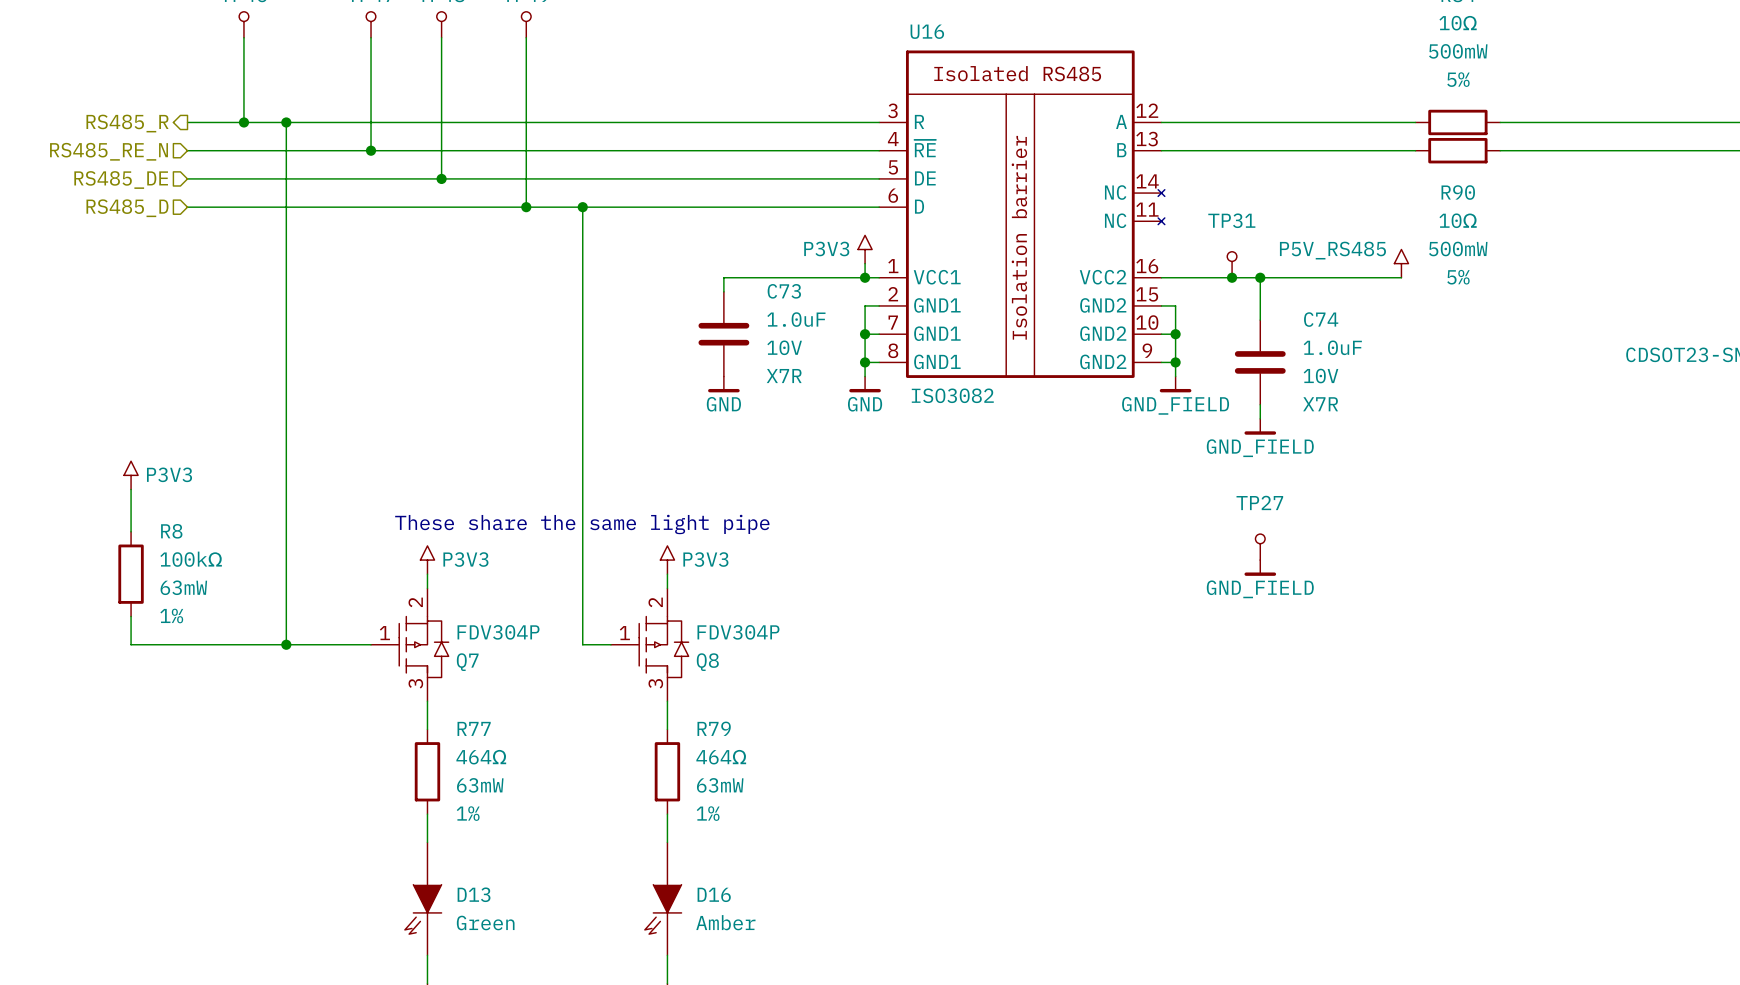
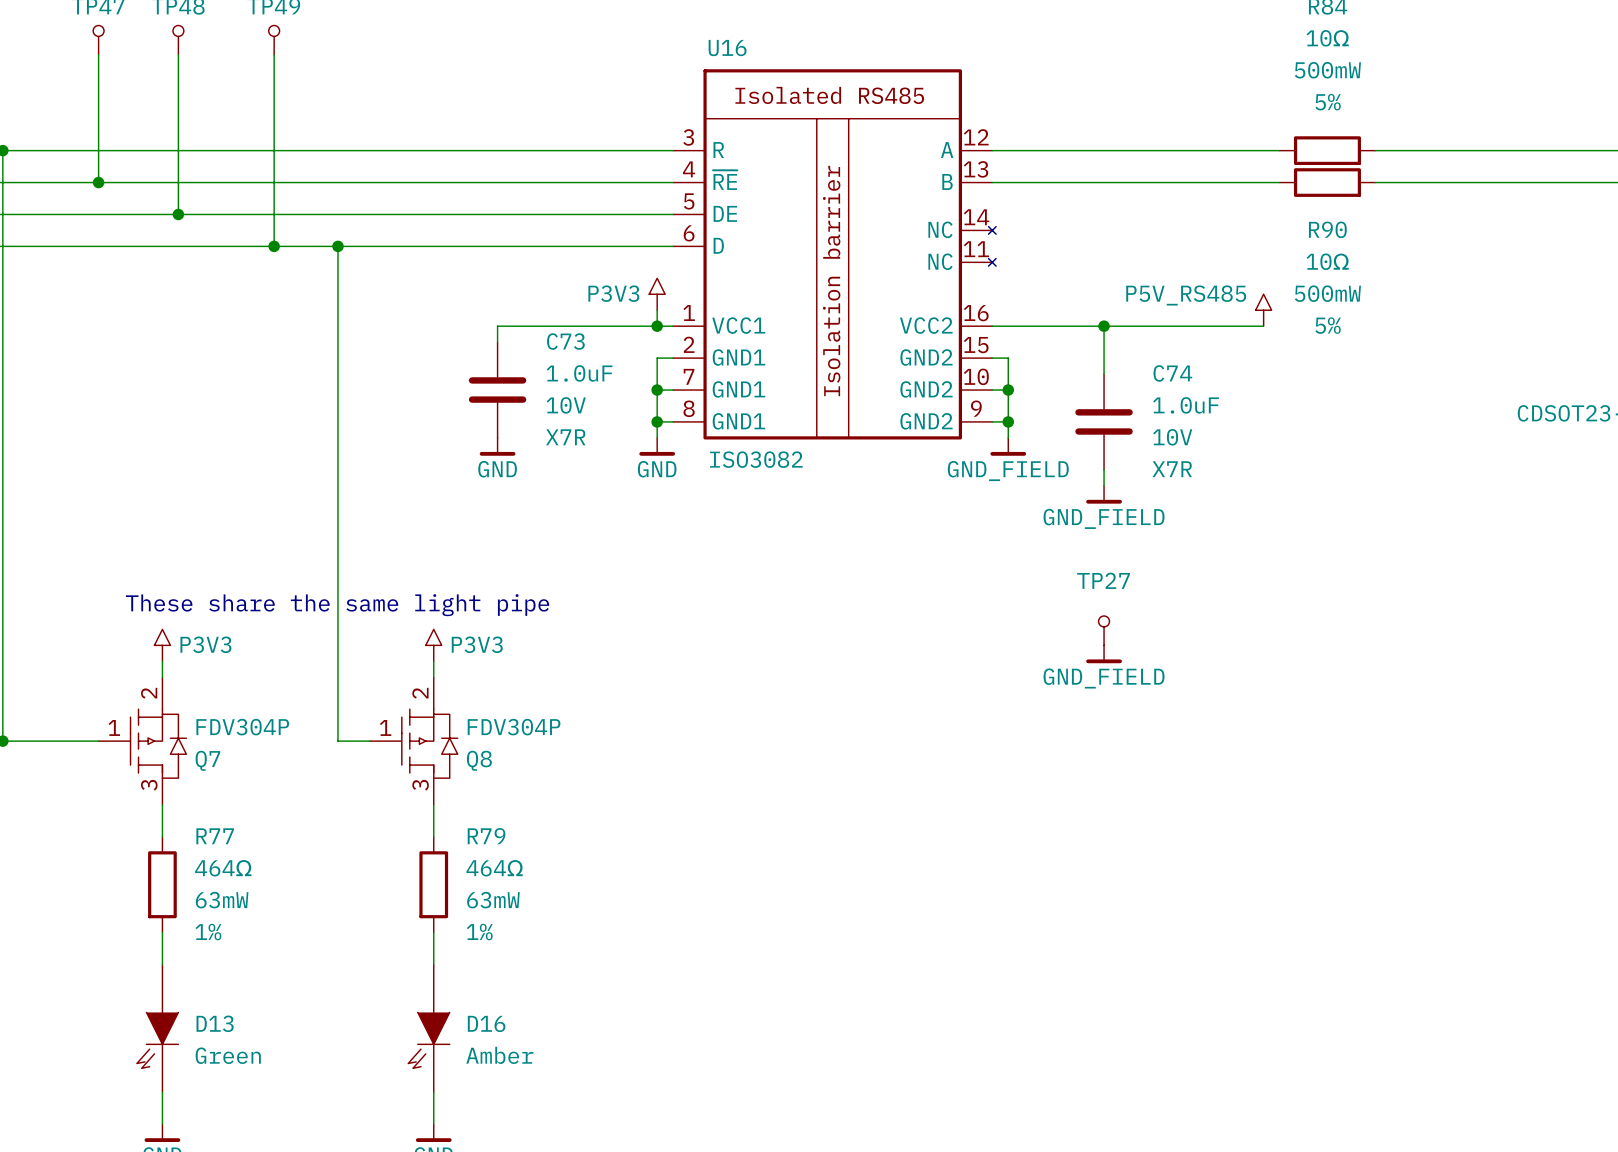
TP31: (1232, 264) -> none
junction: (1232, 277) -> none

